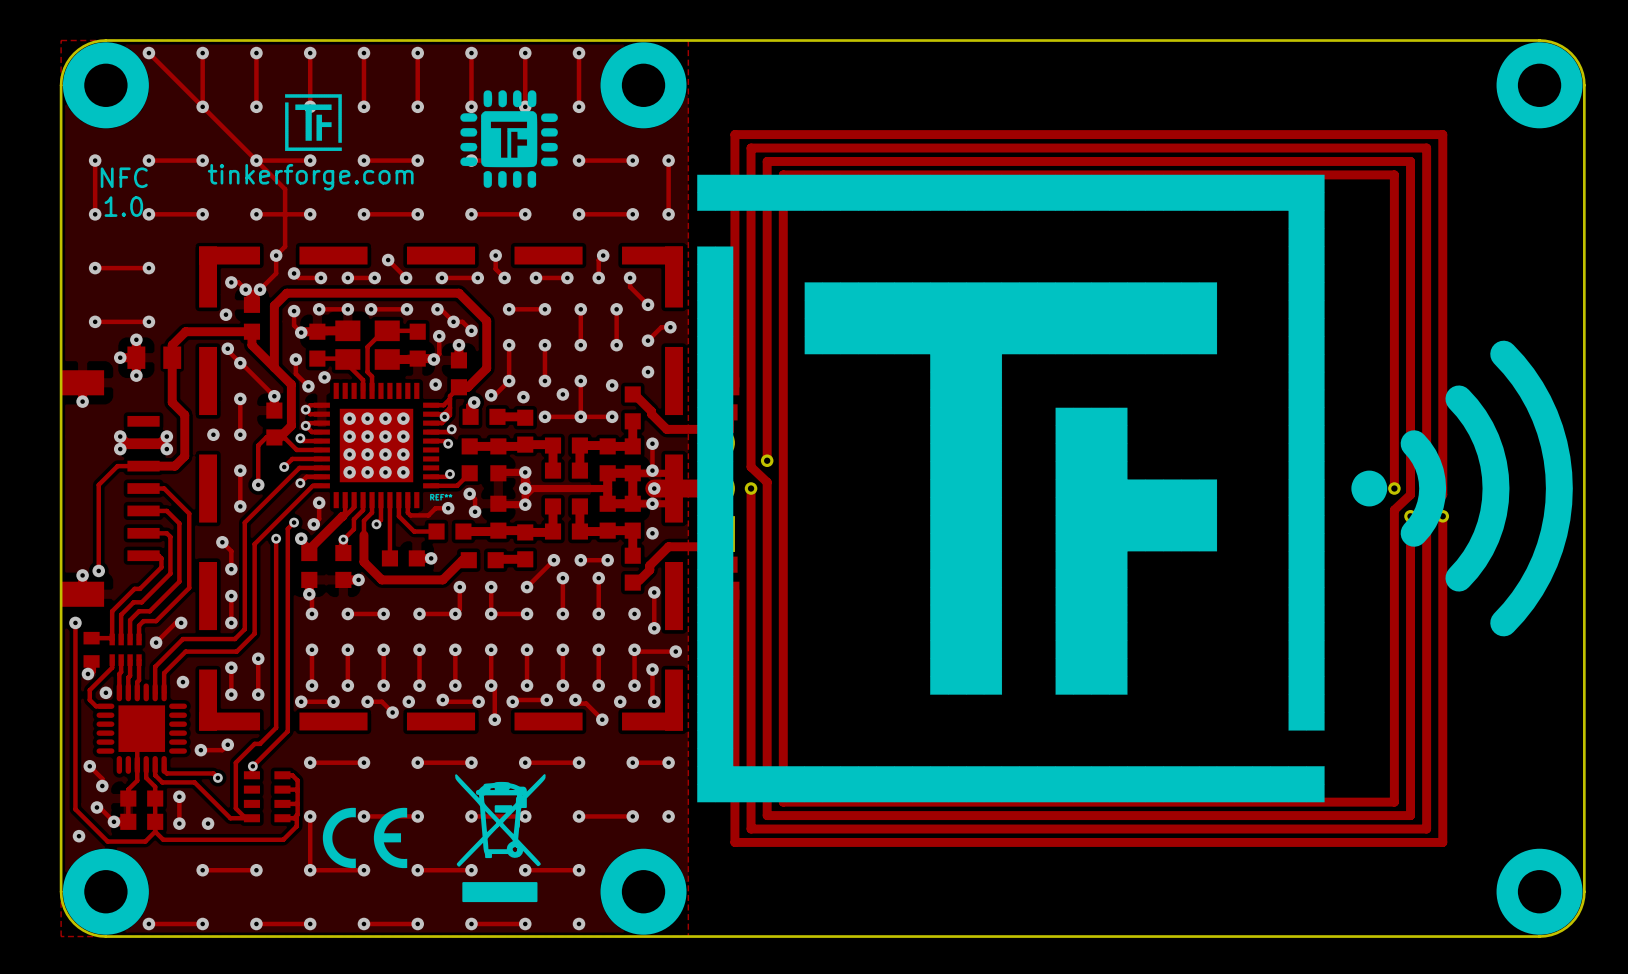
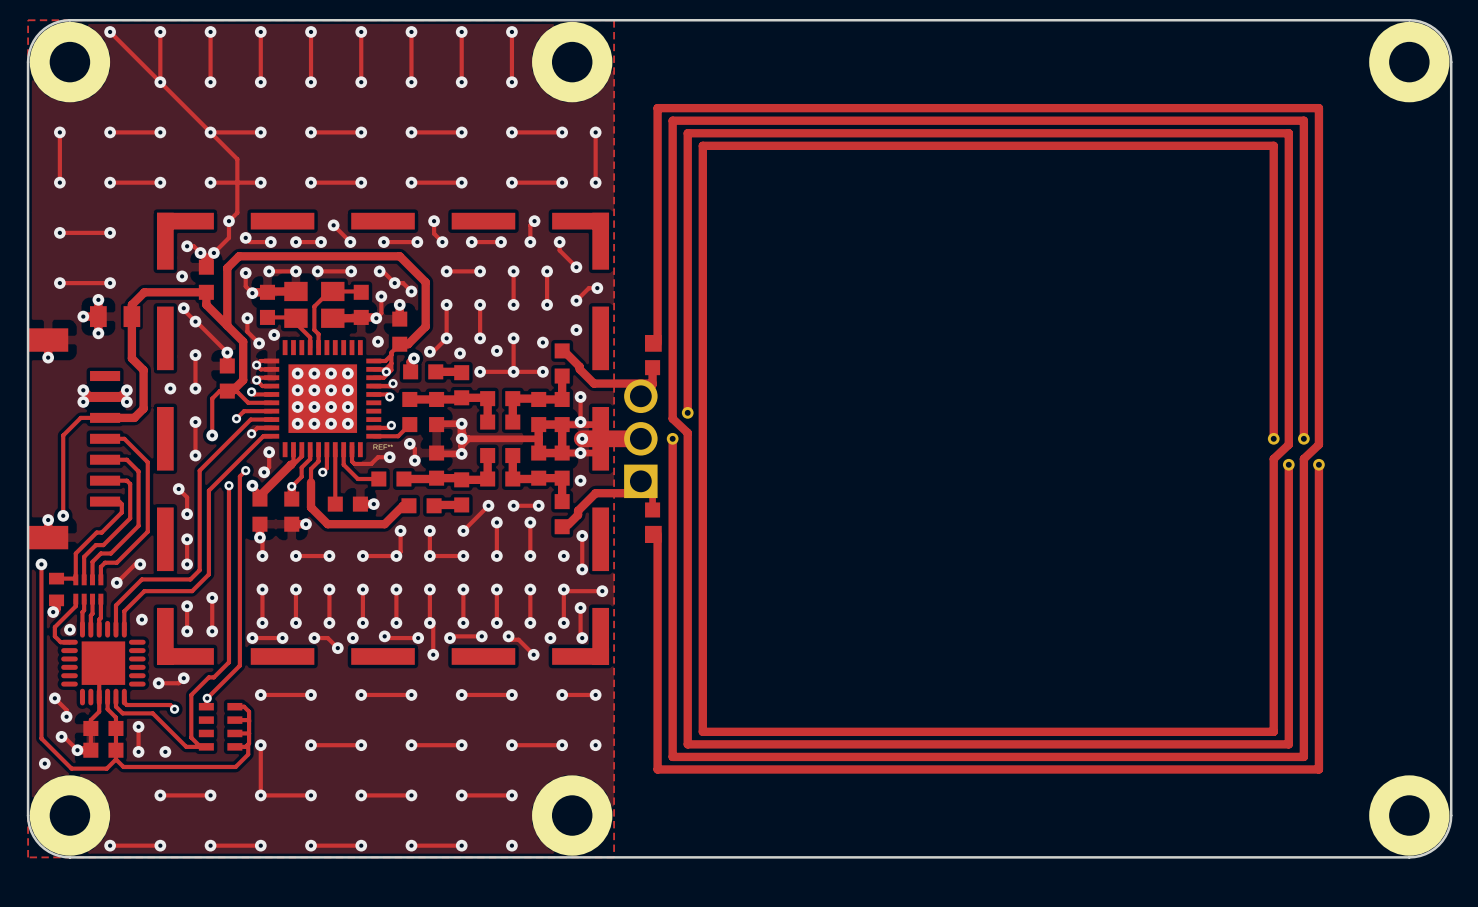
drawing: [460, 90, 558, 188] -> none
drawing: [285, 94, 342, 151] -> none
drawing: [697, 174, 1573, 803] -> none
text: NFC (124, 177) -> none
text: tinkerforge.com (310, 177) -> none
text: 1.0 (123, 206) -> none
drawing: [455, 774, 546, 903] -> none
drawing: [322, 807, 408, 869] -> none

